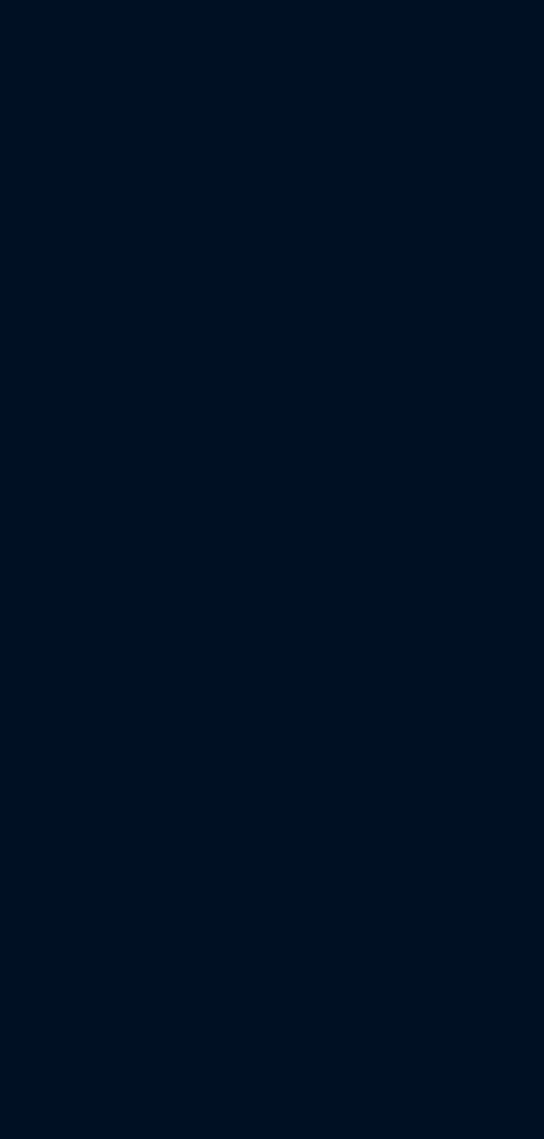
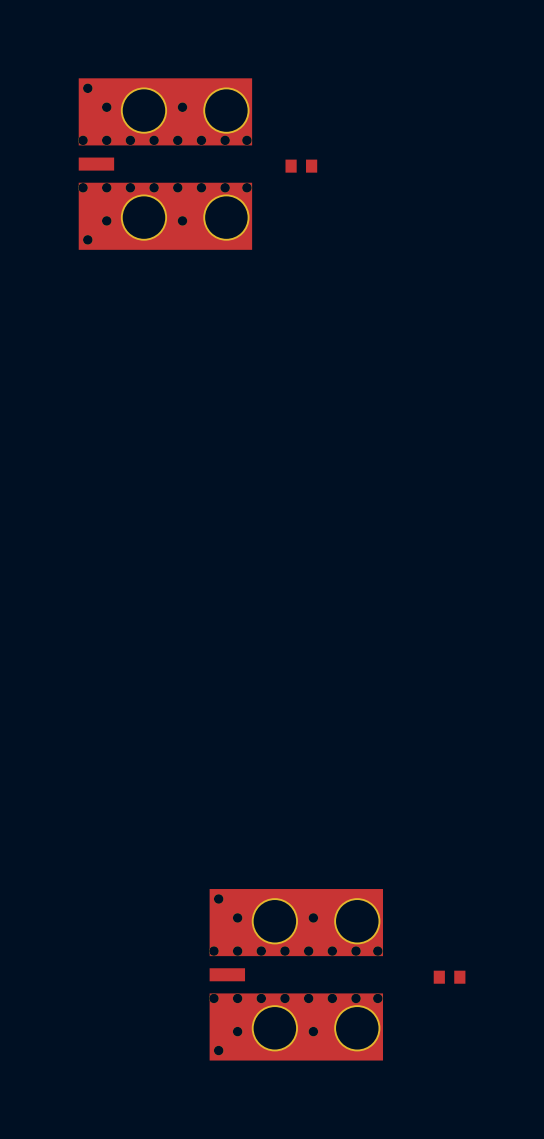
part: none -> (165, 164)
part: none -> (301, 166)
part: none -> (296, 974)
part: none -> (449, 977)

